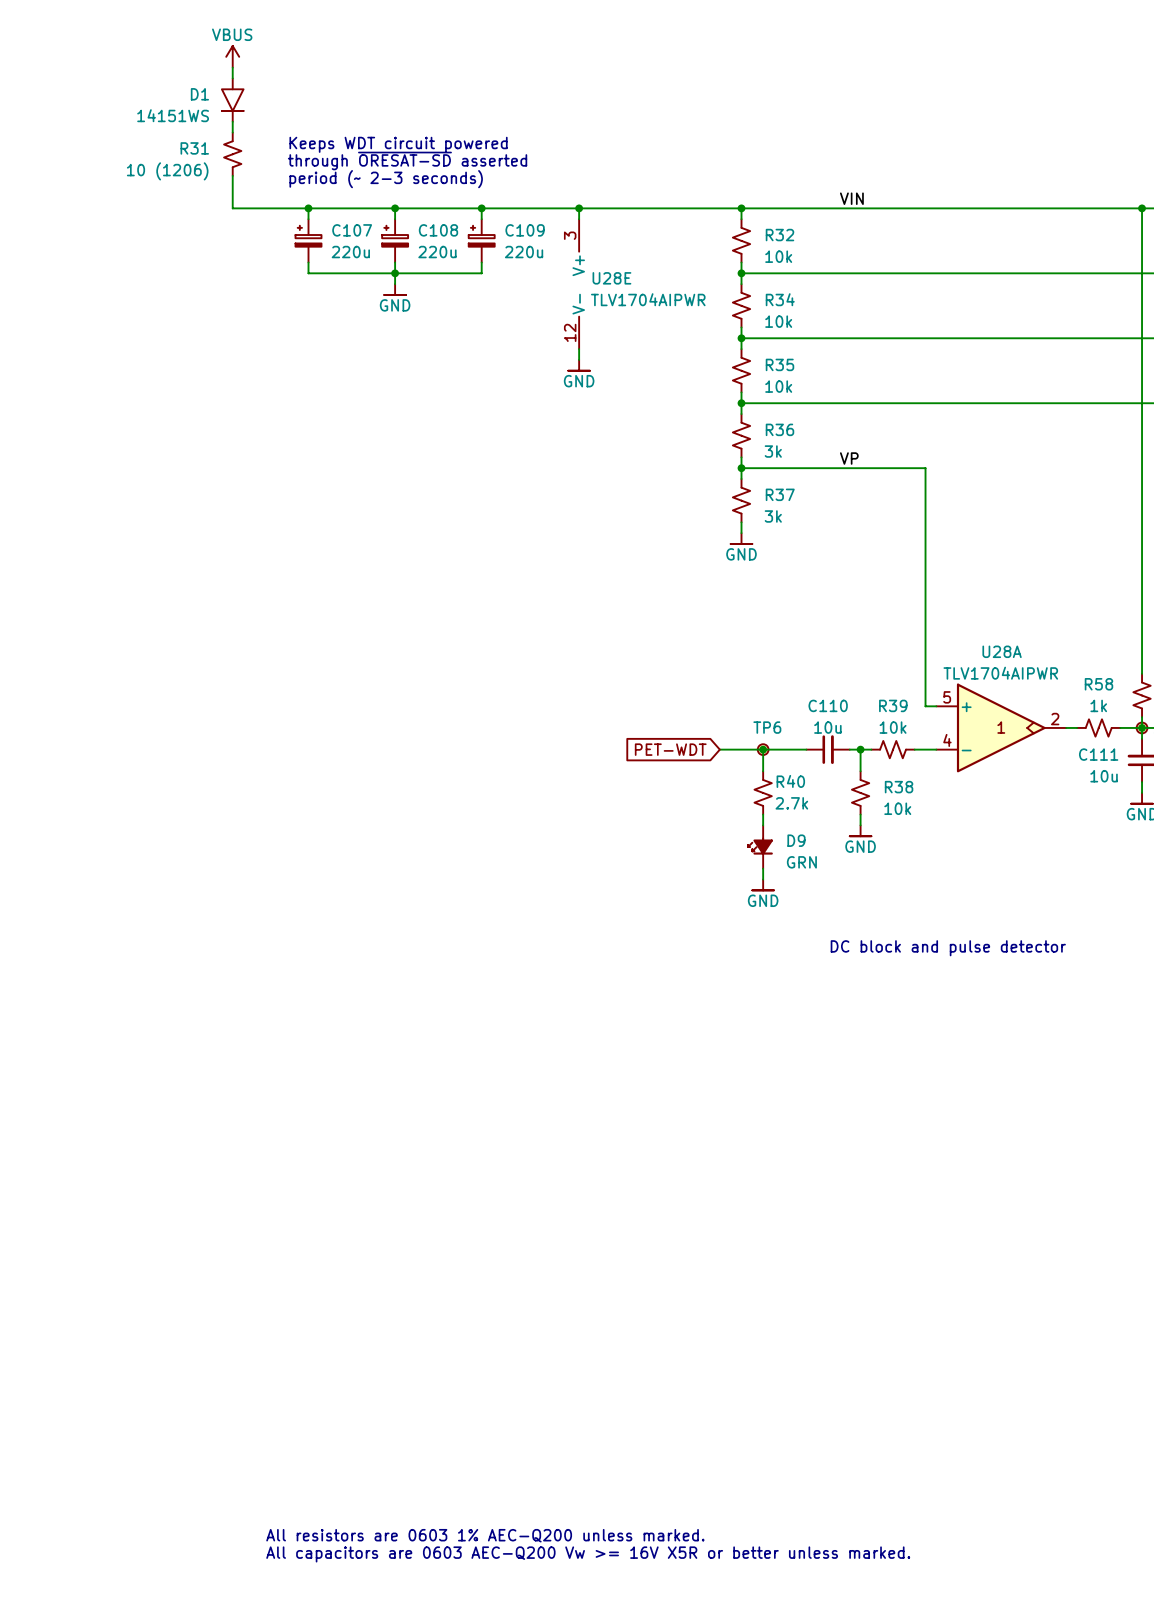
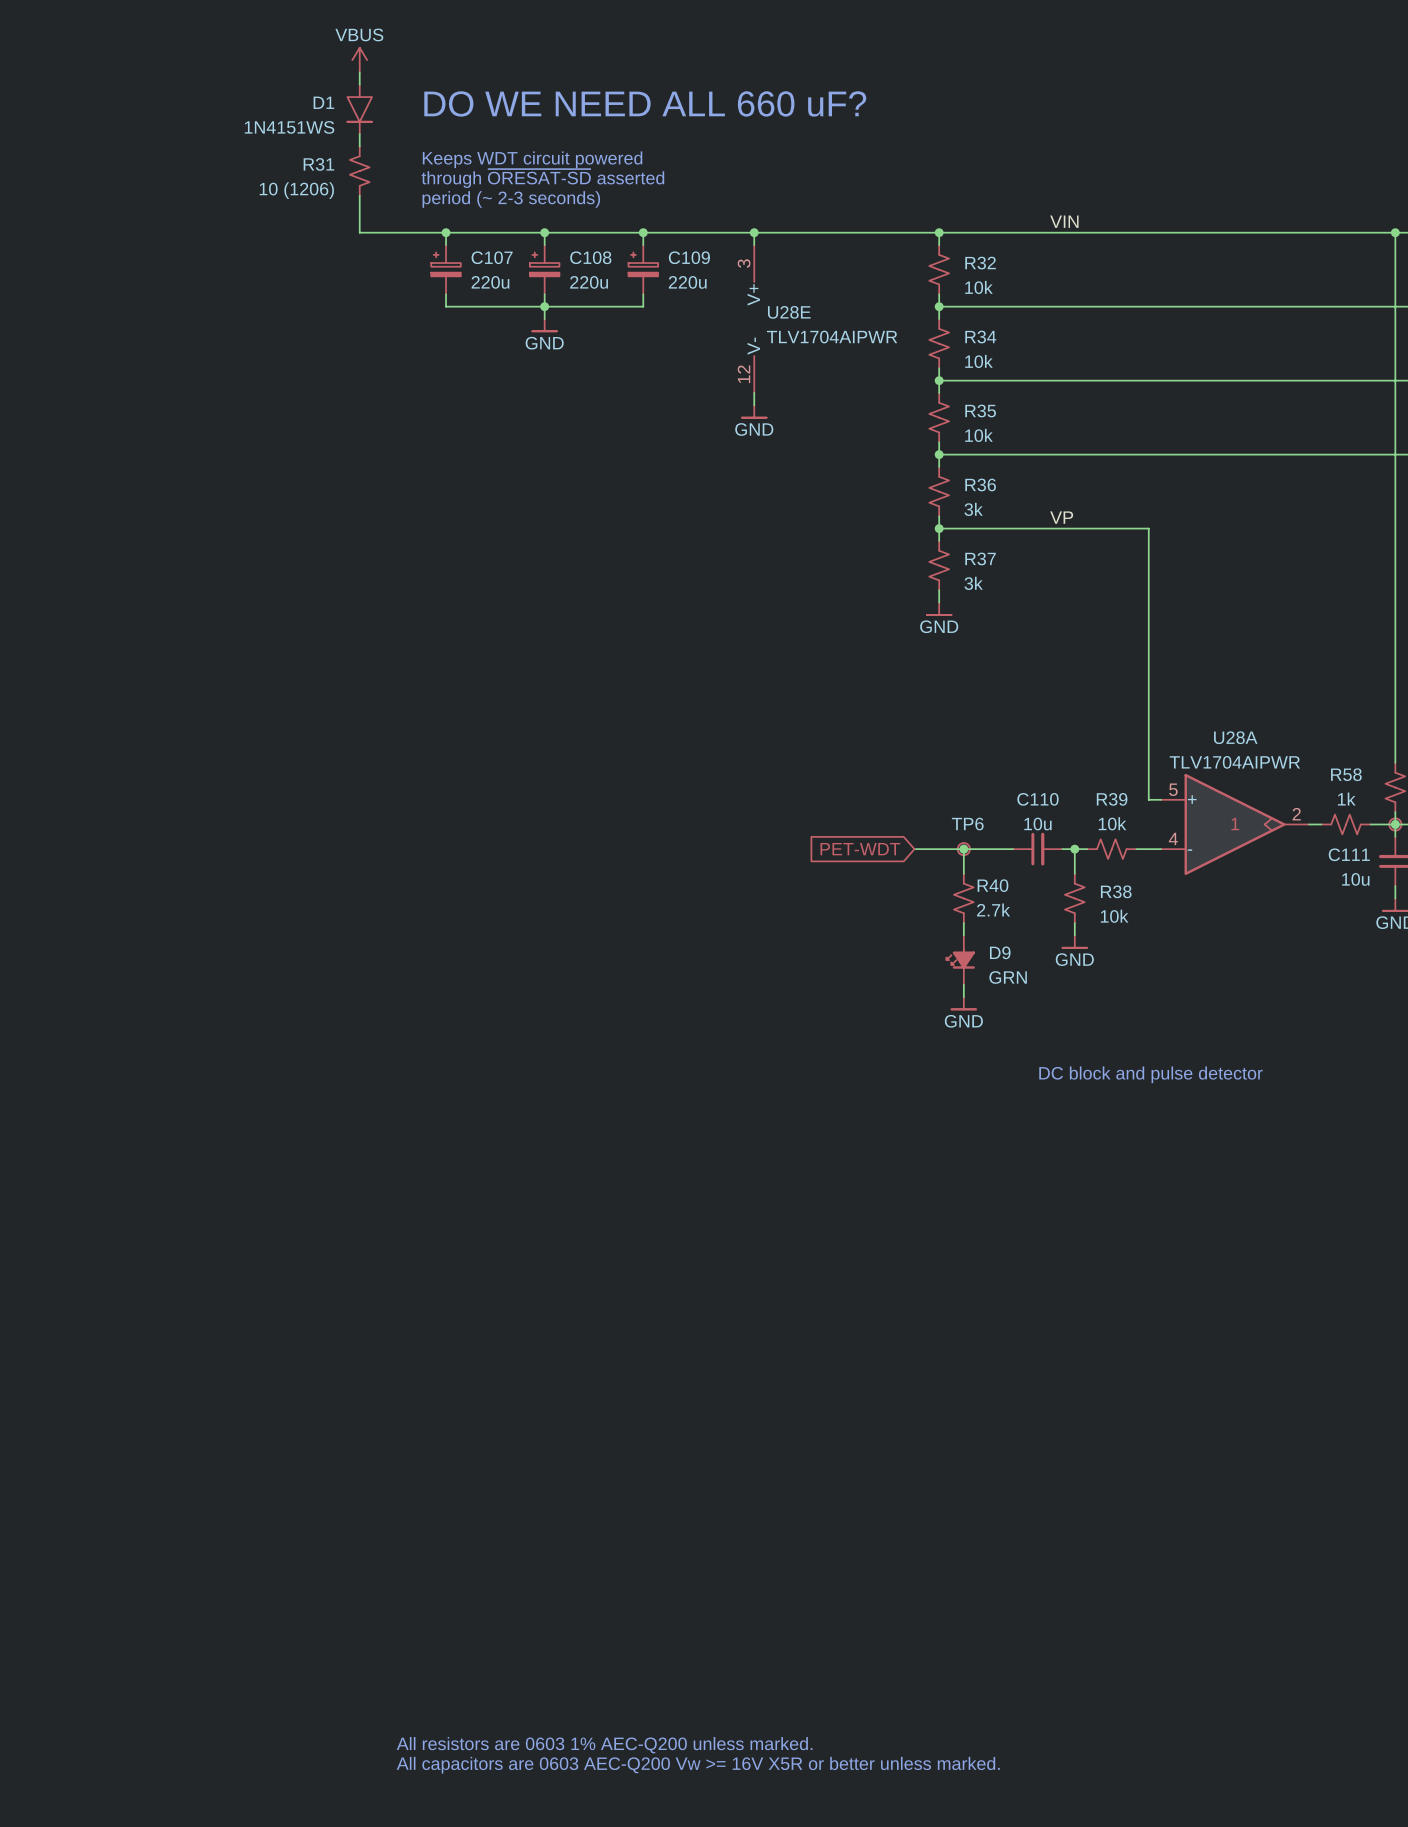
text: none -> DO WE NEED ALL 660 uF? (645, 103)
D1 value: 14151WS (173, 115) -> 1N4151WS (289, 127)

